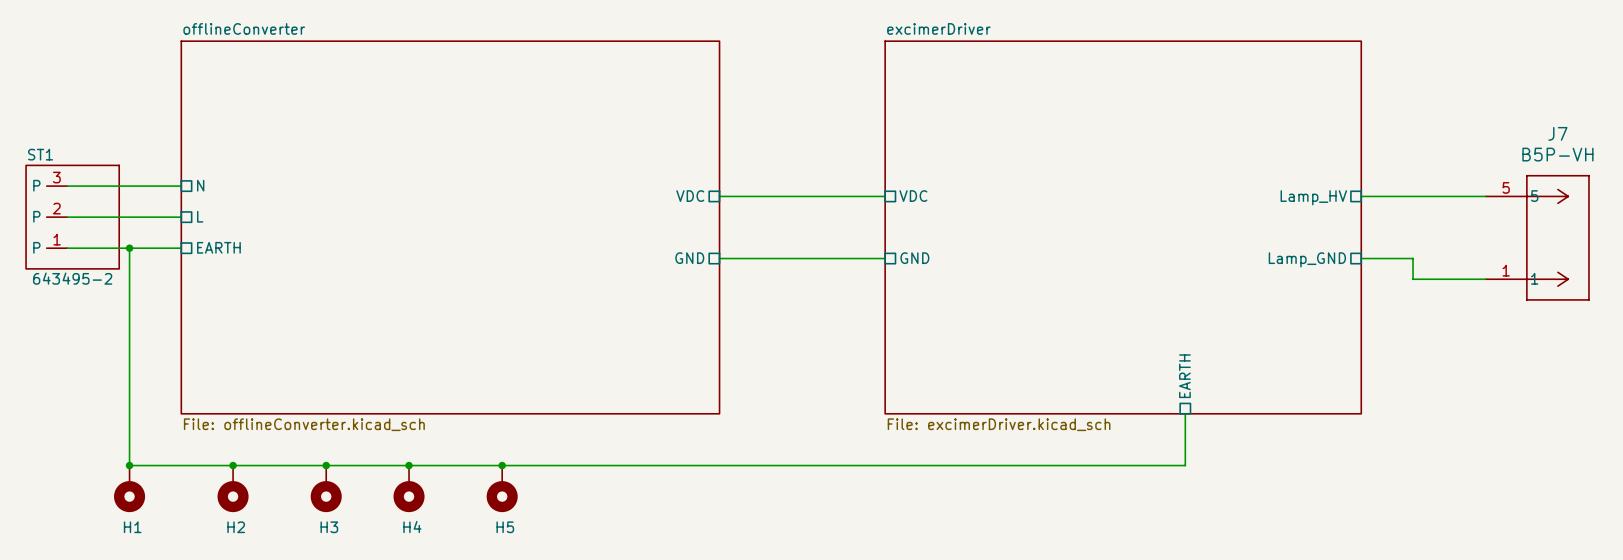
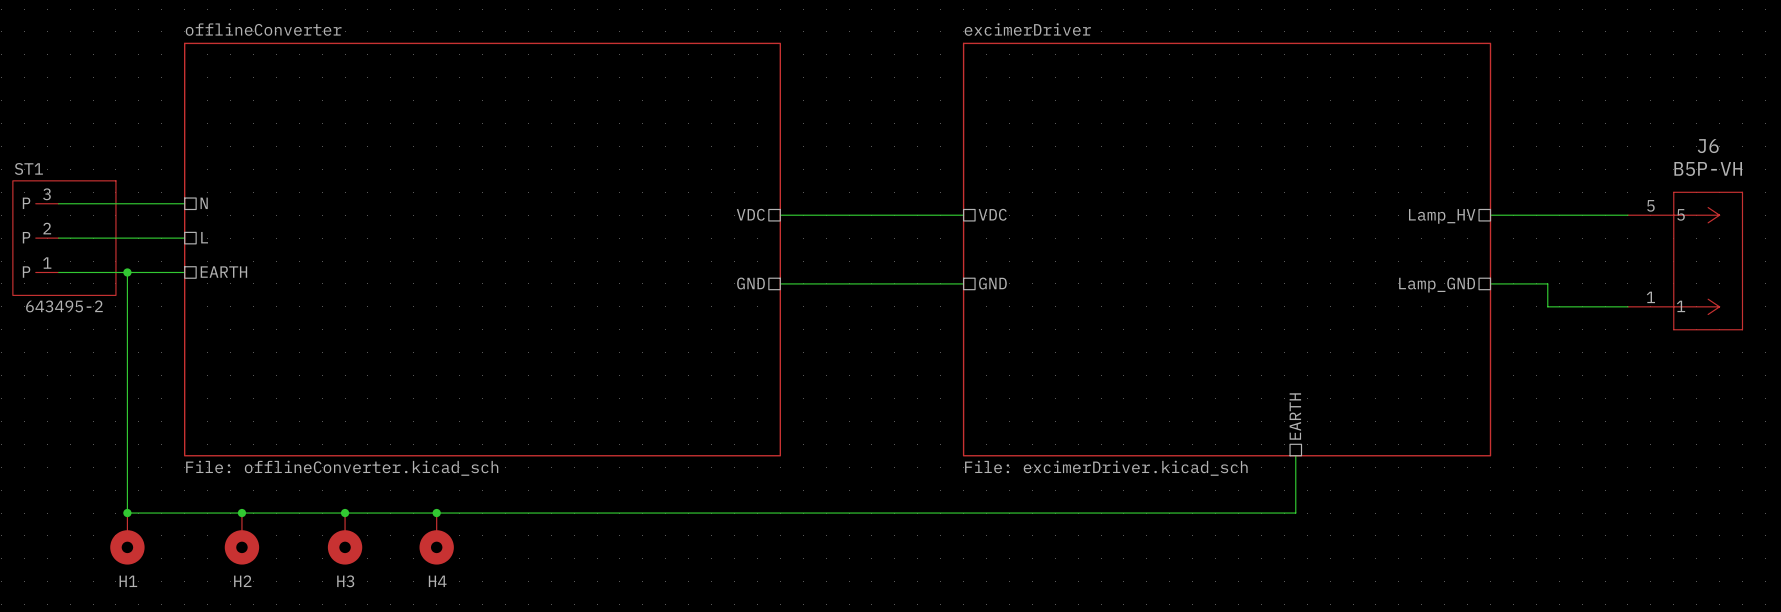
J7 name: J7 (1557, 133) -> J6 (1708, 146)
junction: (502, 465) -> none
H5: (502, 488) -> none

